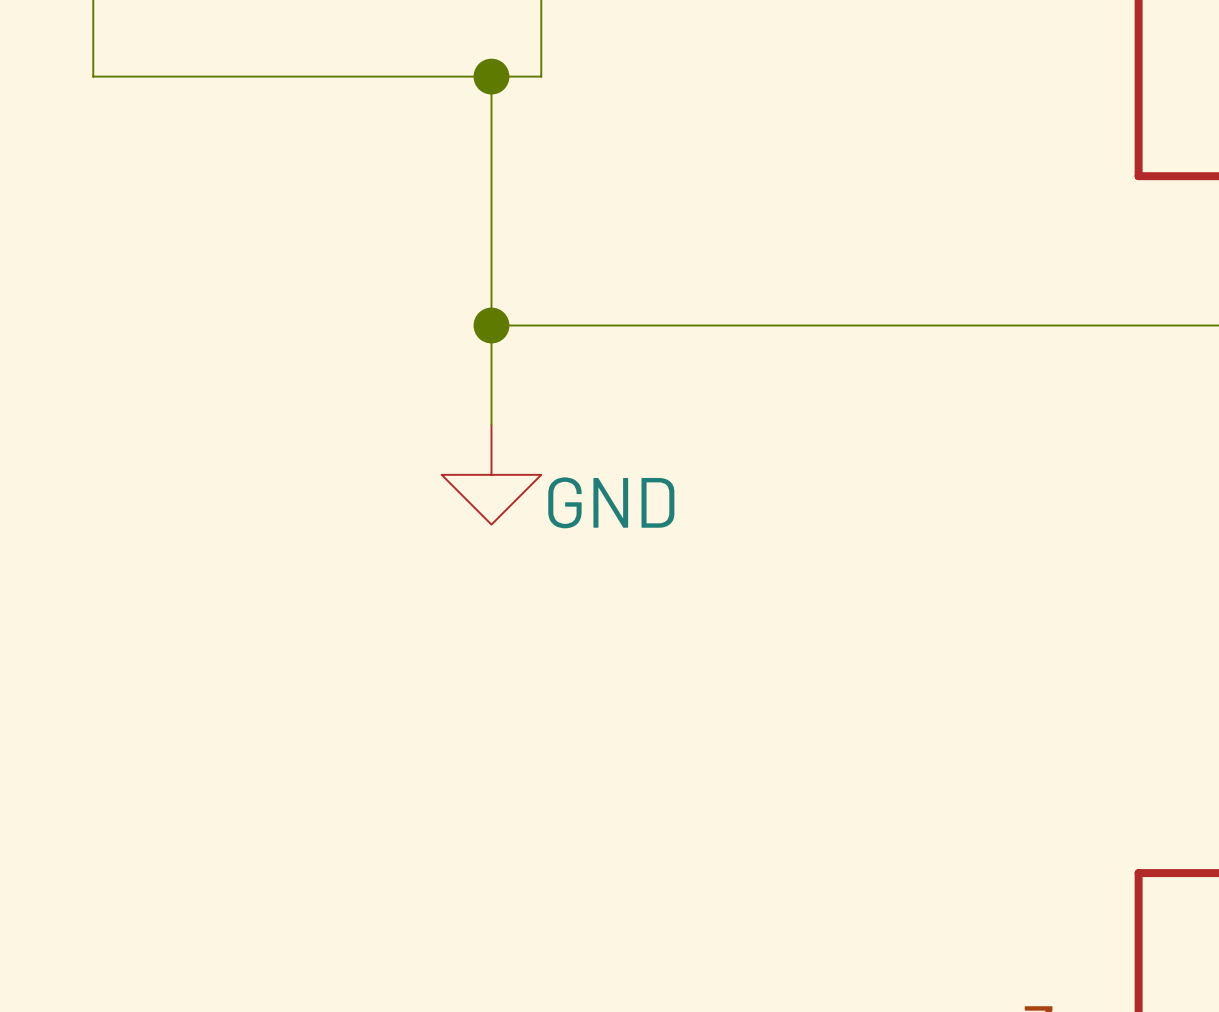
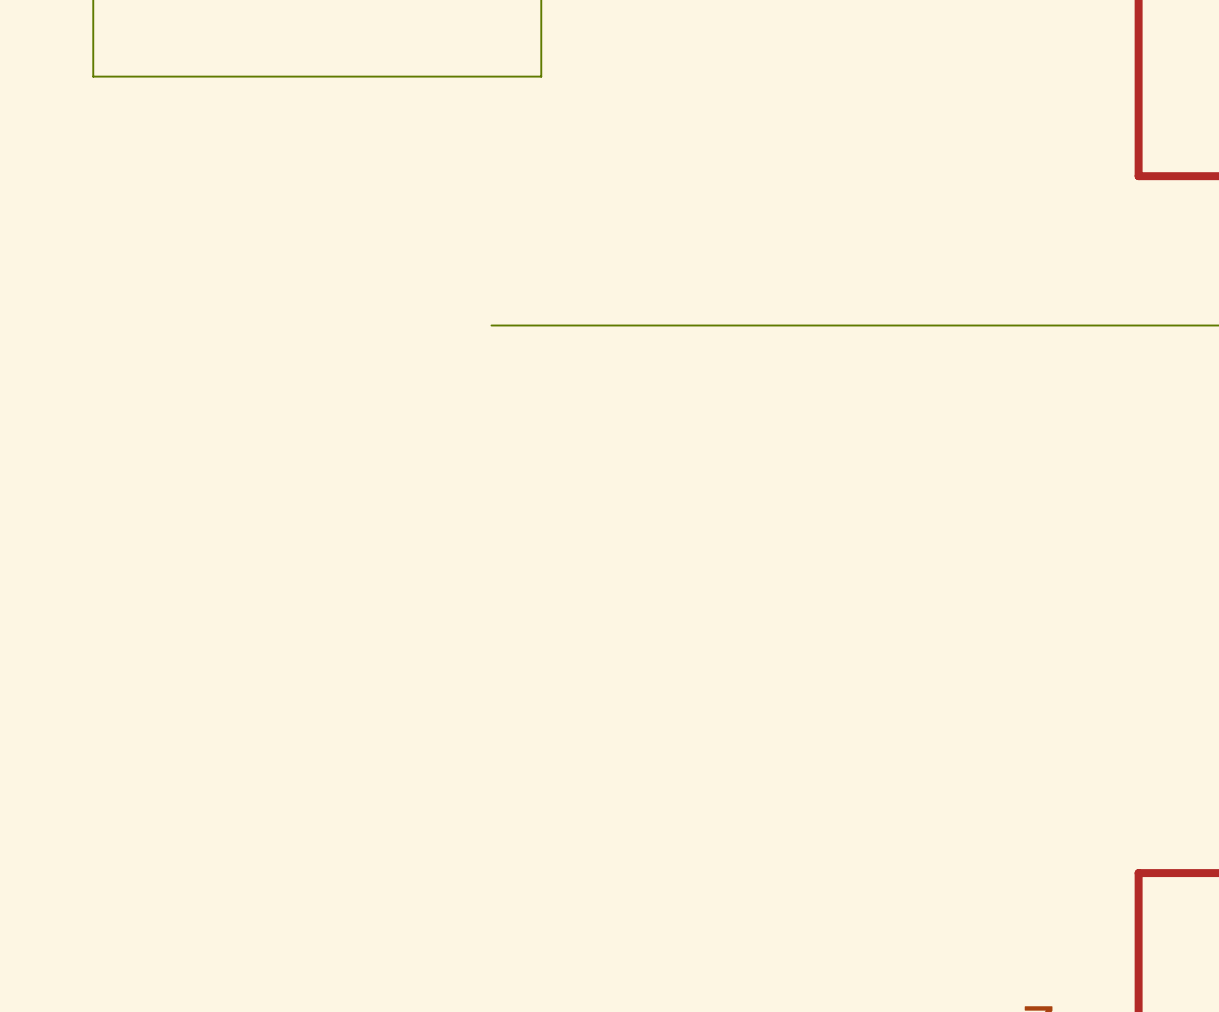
wire: (491, 76) (491, 425) -> none
junction: (491, 76) -> none
junction: (491, 325) -> none
power symbol: GND (491, 474) -> none

